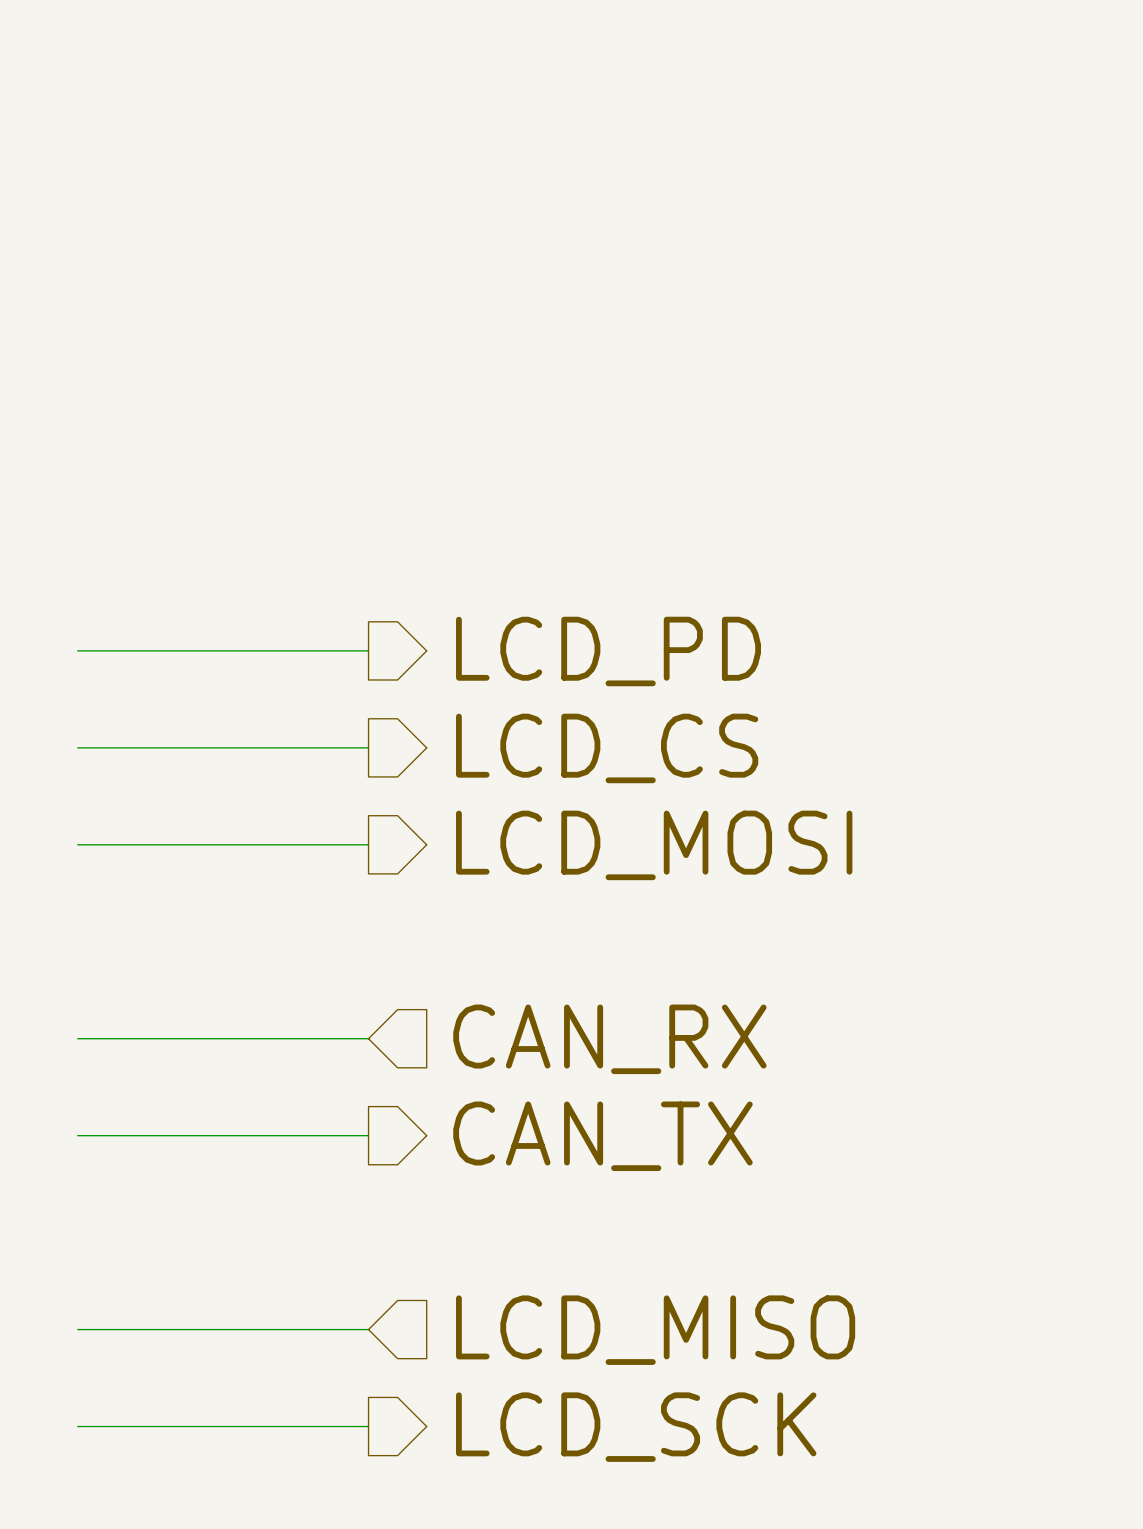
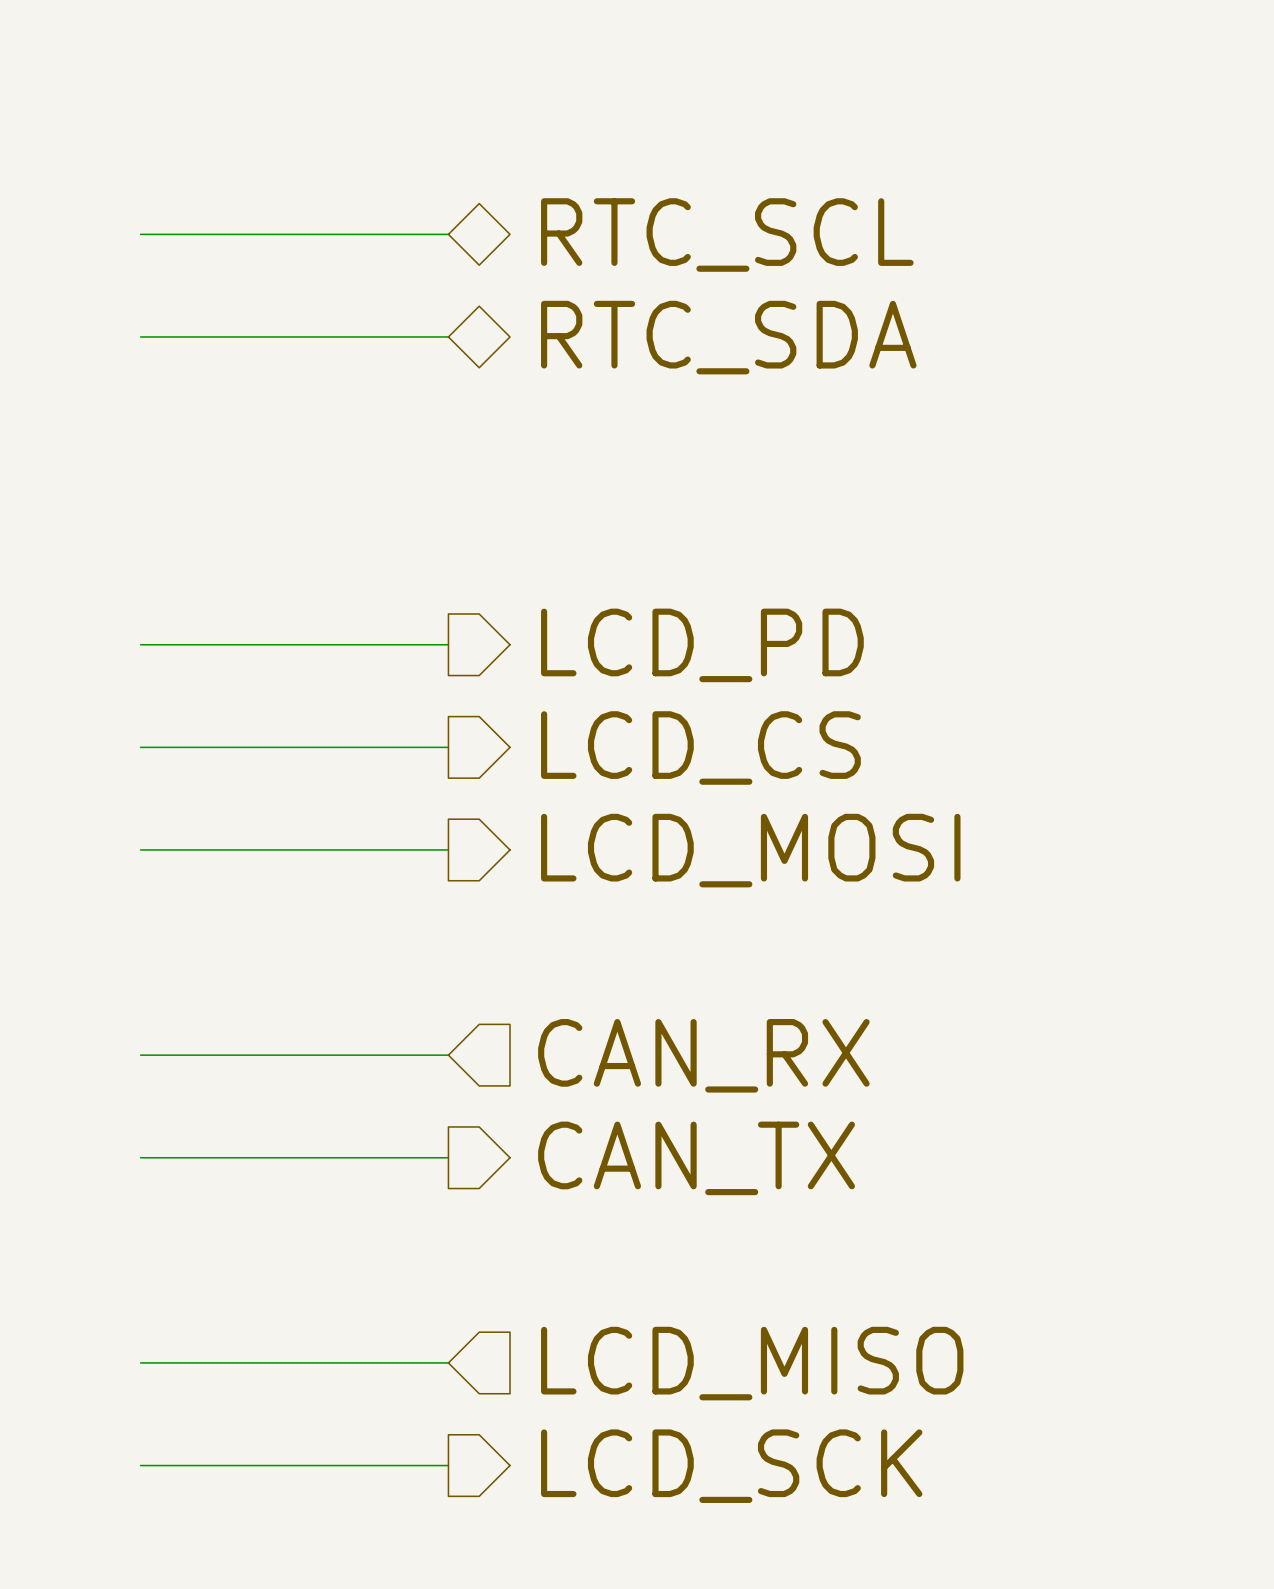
wire: none -> (140, 234) (448, 234)
hierarchical label: none -> RTC_SCL (727, 235)
wire: none -> (140, 336) (448, 336)
hierarchical label: none -> RTC_SDA (728, 337)

